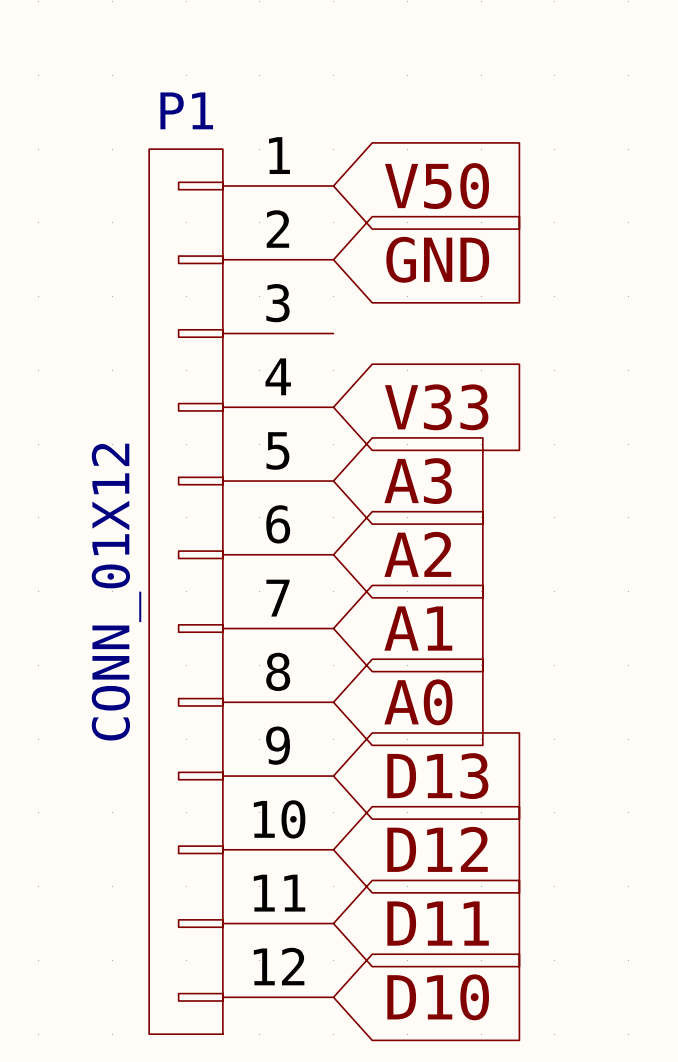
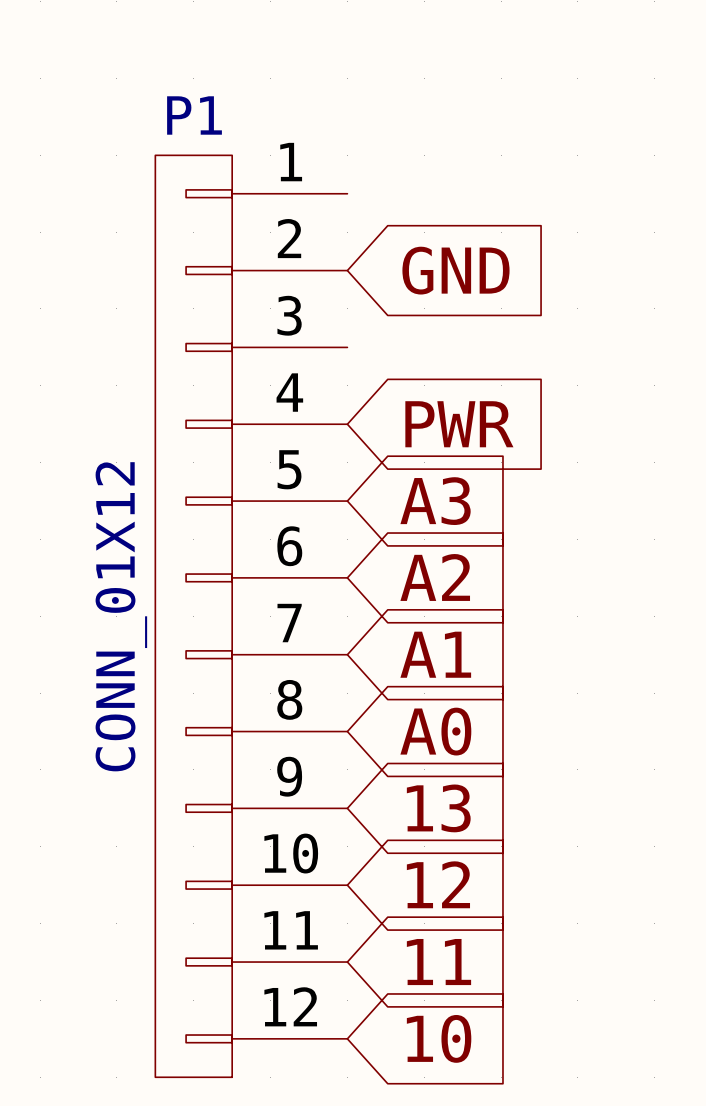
global label: V50 (436, 186) -> none
global label: V33 (436, 407) -> PWR (459, 424)
global label: D13 (437, 776) -> 13 (438, 808)
global label: D12 (437, 849) -> 12 (438, 884)
global label: D11 (438, 923) -> 11 (438, 962)
global label: D10 (438, 997) -> 10 (439, 1038)

